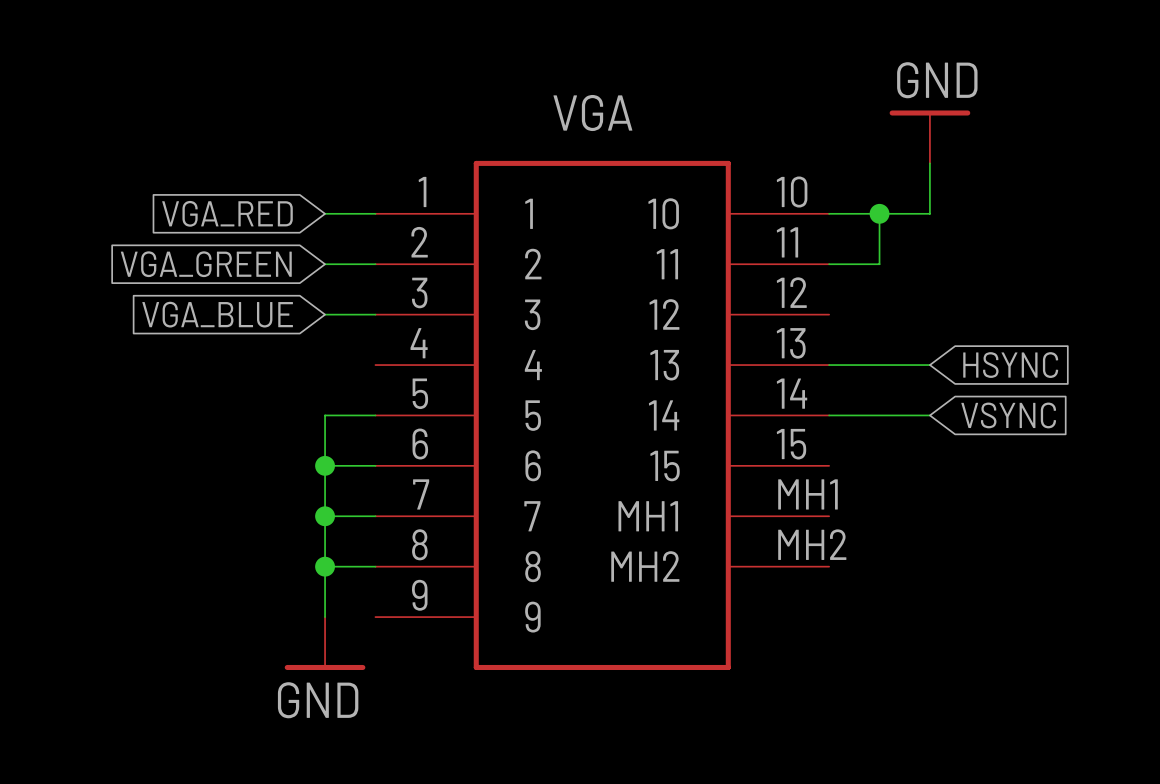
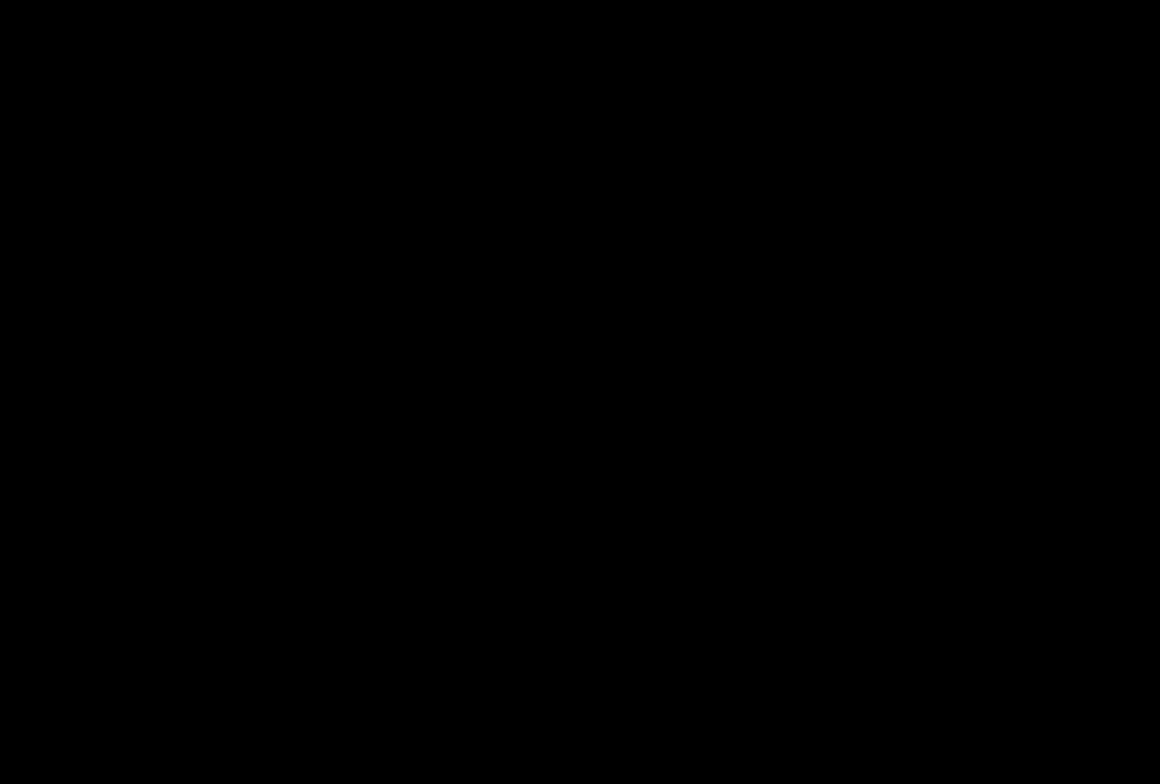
power symbol: GND (929, 136) -> none
wire: (929, 163) (929, 213) (829, 213) -> none
global label: VGA_RED (227, 213) -> none
wire: (325, 213) (375, 213) -> none
wire: (879, 213) (879, 264) (829, 264) -> none
junction: (879, 213) -> none
global label: VGA_GREEN (206, 264) -> none
wire: (325, 264) (375, 264) -> none
global label: VGA_BLUE (217, 314) -> none
wire: (325, 314) (375, 314) -> none
wire: (829, 365) (929, 365) -> none
global label: HSYNC (1010, 365) -> none
wire: (375, 415) (325, 415) (325, 617) -> none
VGA: (602, 415) -> none
wire: (829, 415) (929, 415) -> none
global label: VSYNC (1008, 415) -> none
wire: (325, 465) (375, 465) -> none
junction: (325, 465) -> none
wire: (325, 516) (375, 516) -> none
junction: (325, 516) -> none
wire: (325, 566) (375, 566) -> none
junction: (325, 566) -> none
power symbol: GND (325, 643) -> none

